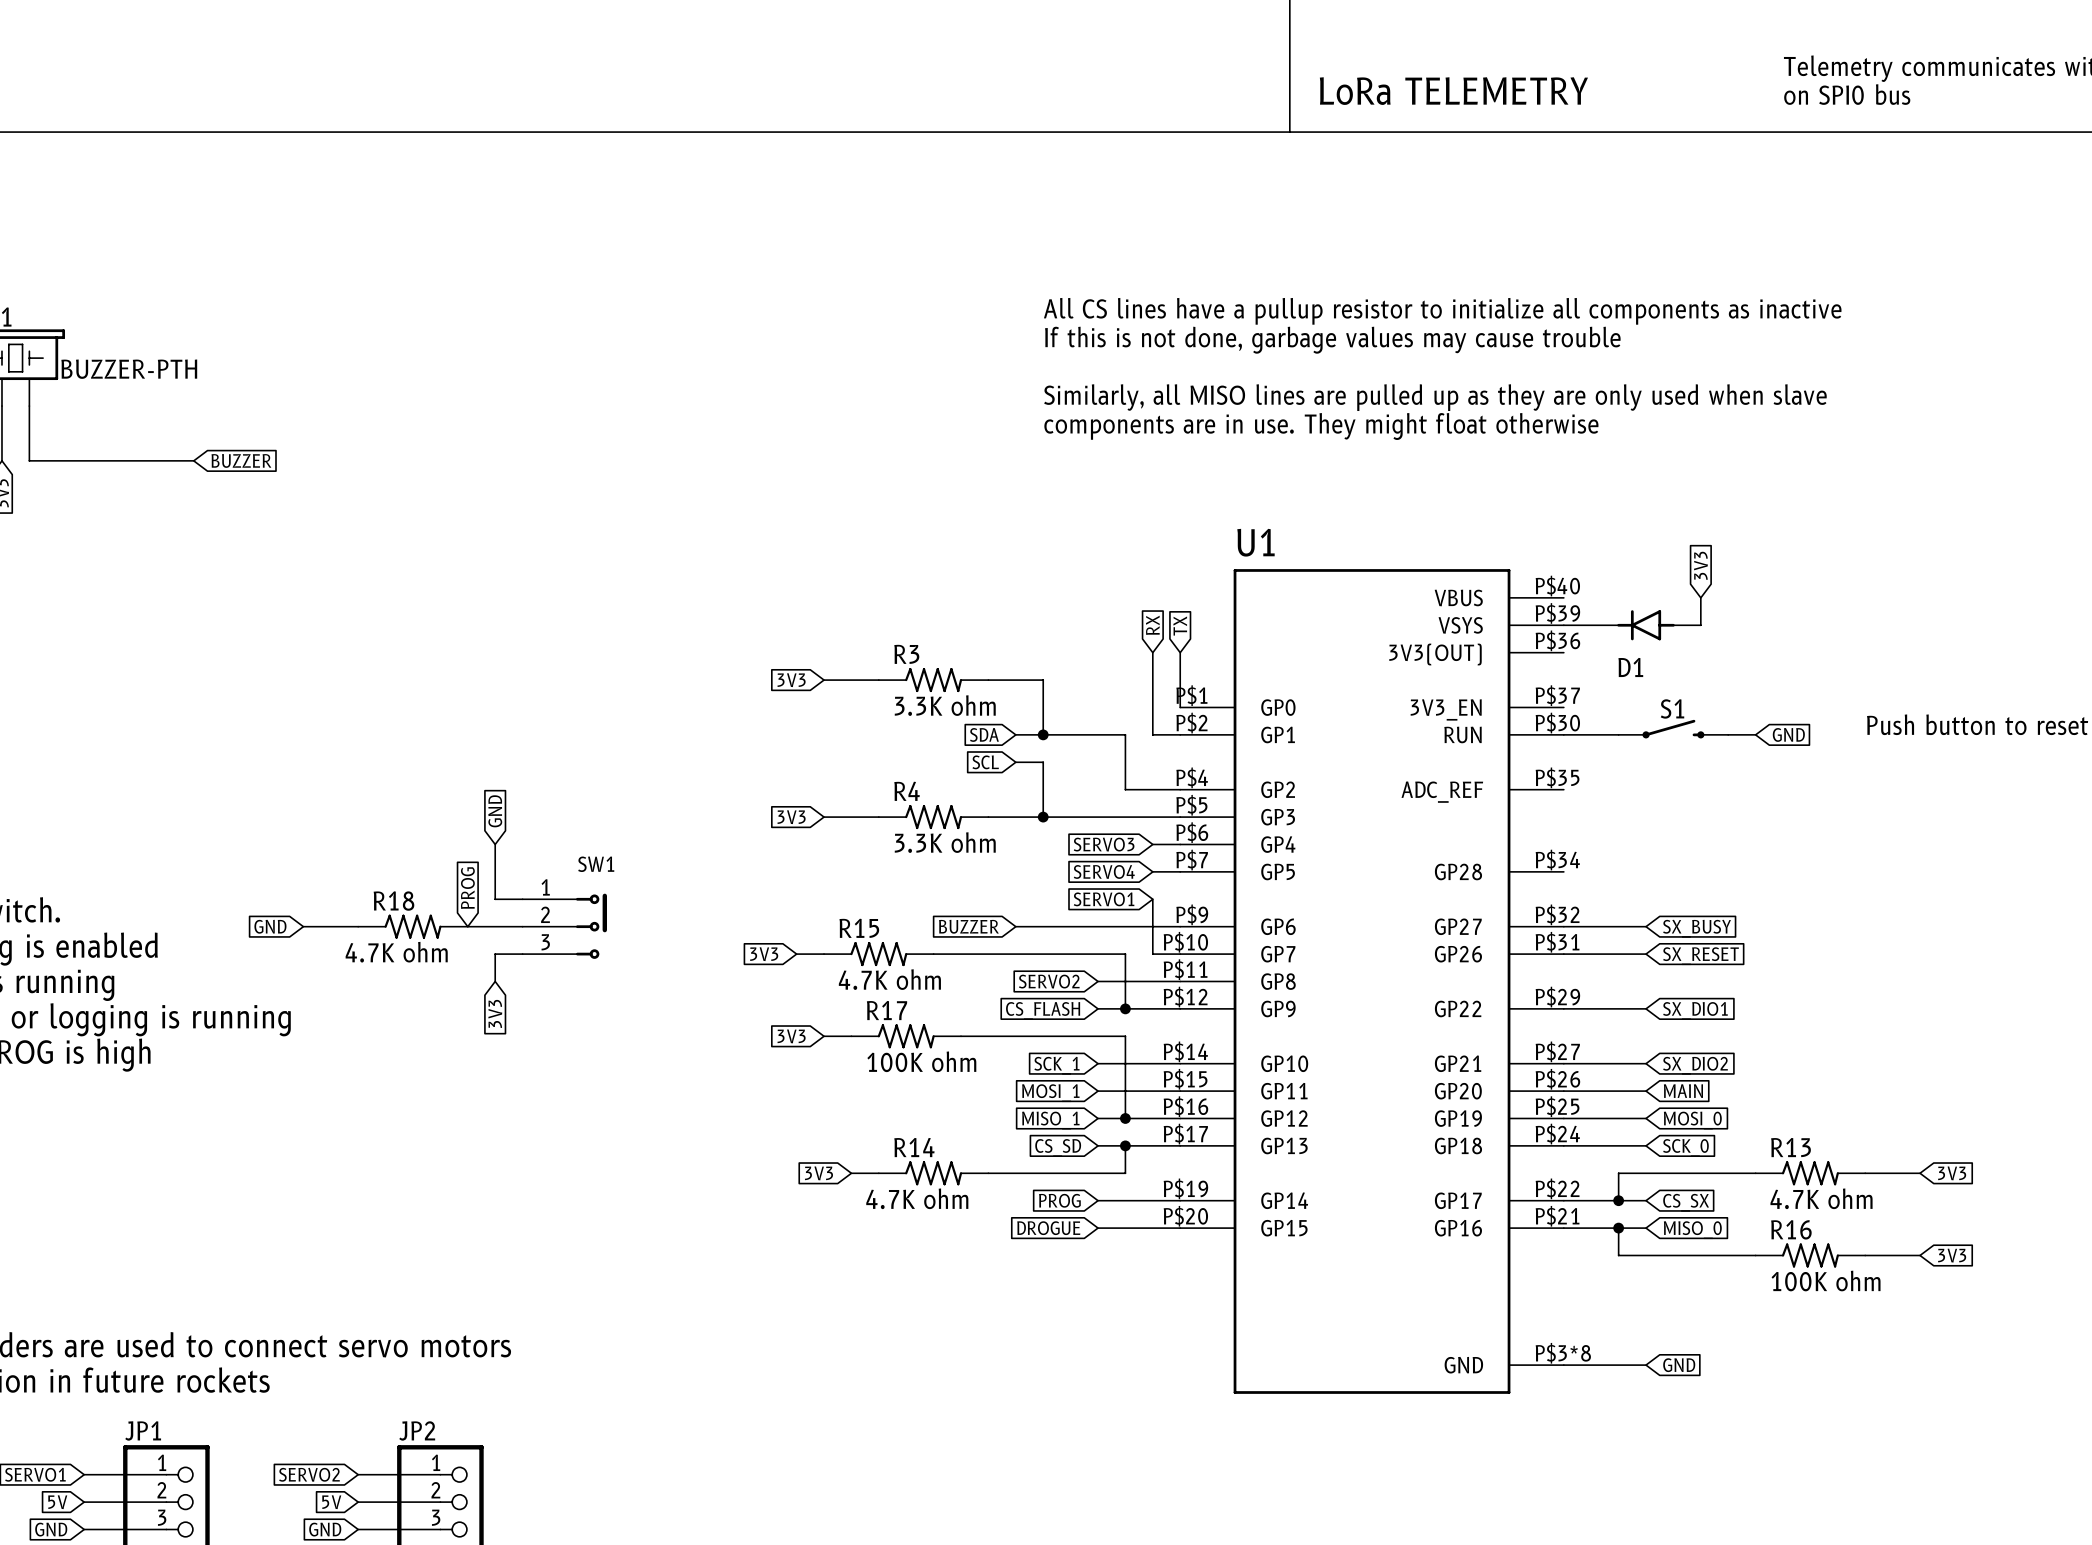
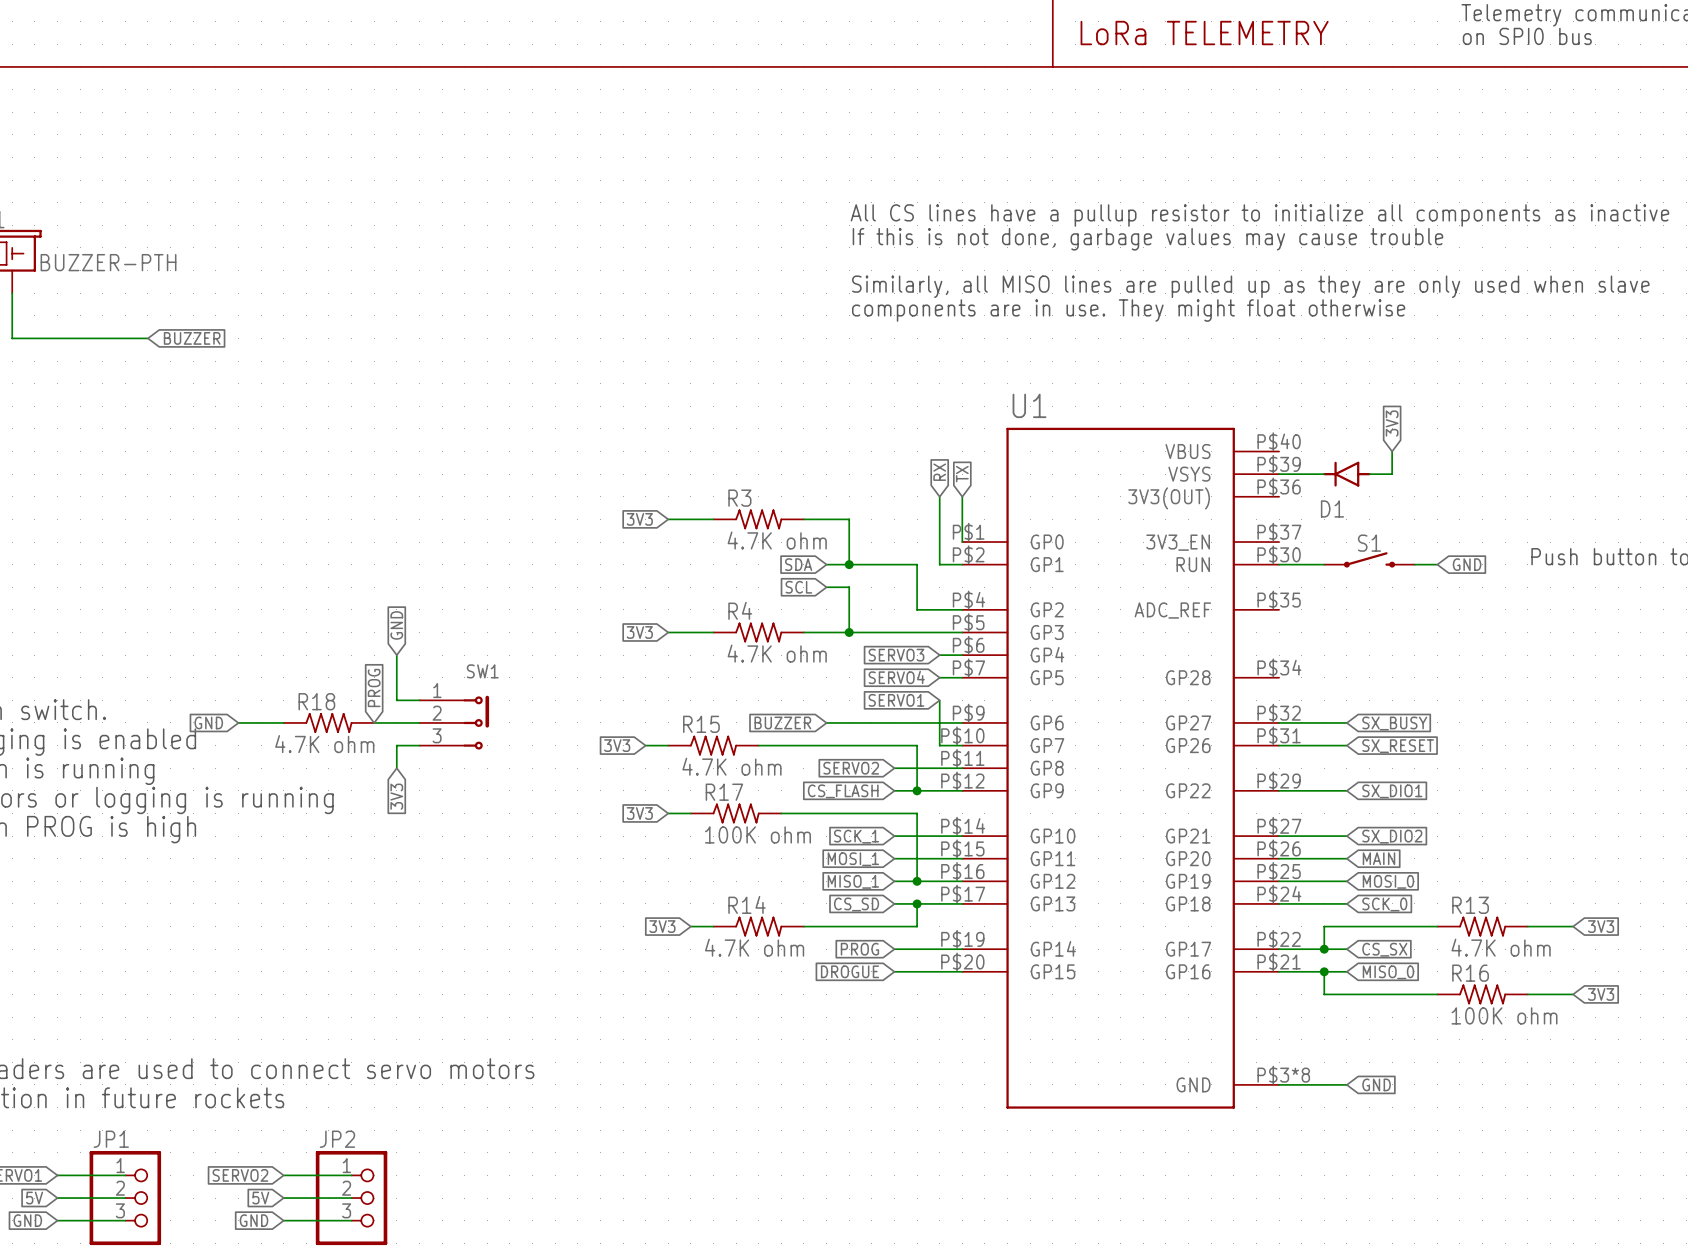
R3 value: 3.3K ohm (945, 705) -> 4.7K ohm (777, 540)
R4 value: 3.3K ohm (945, 842) -> 4.7K ohm (777, 653)

